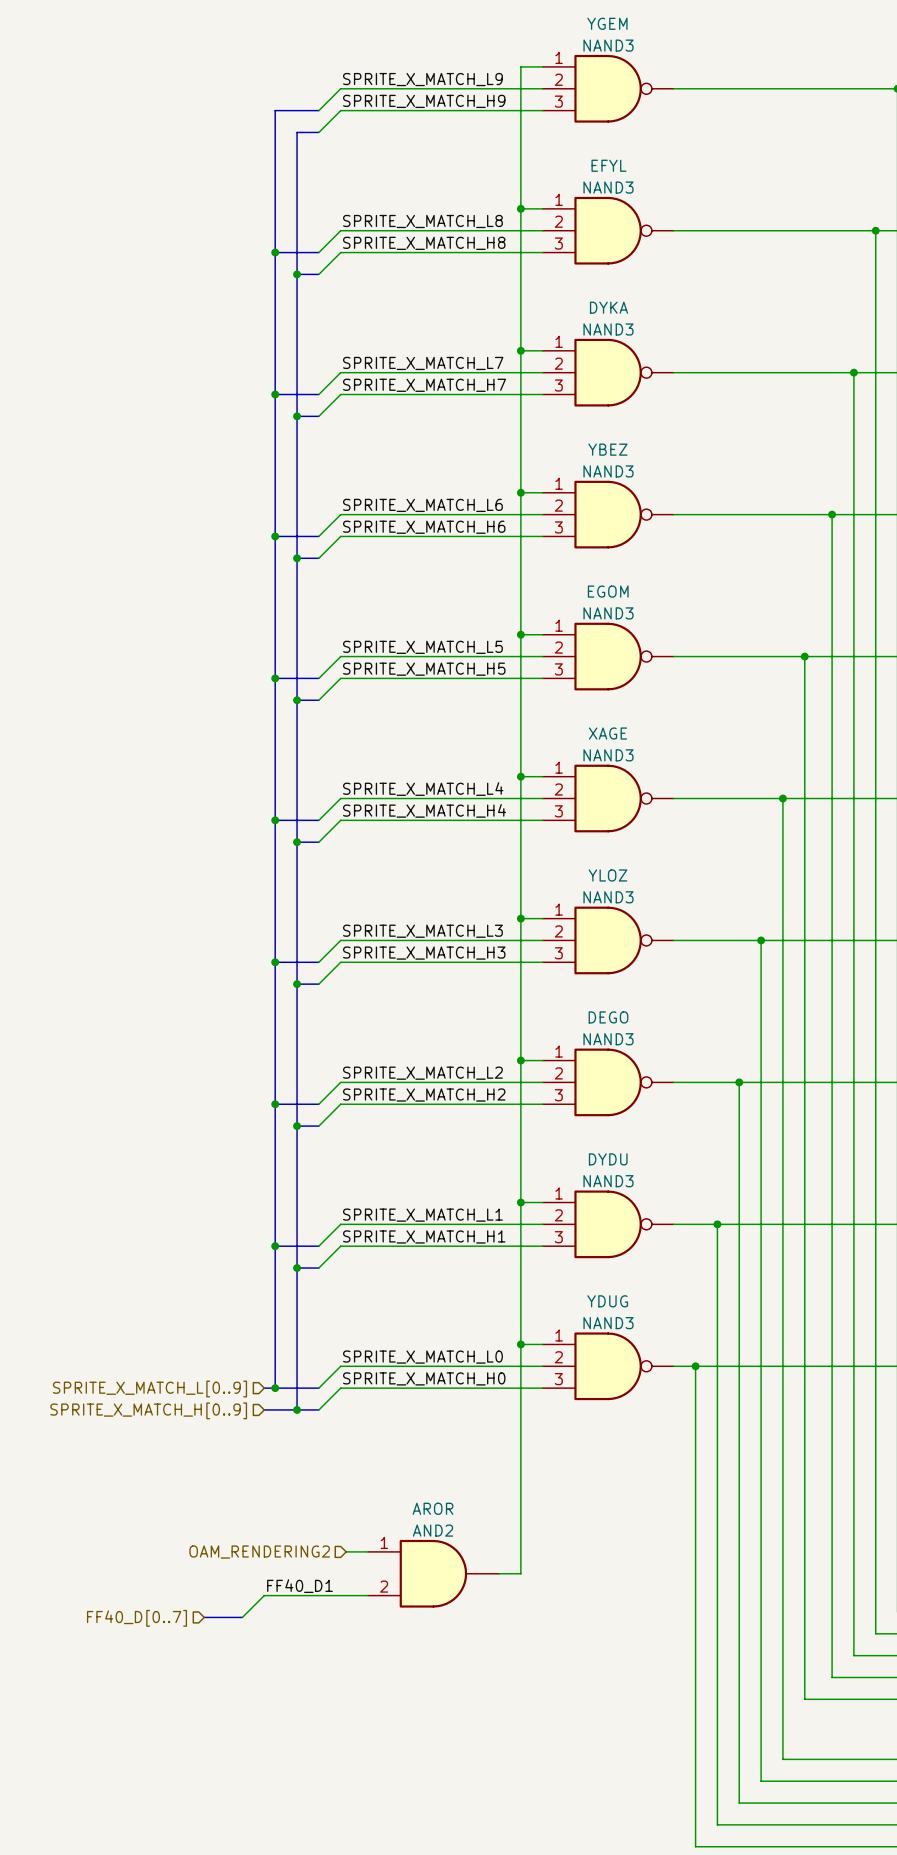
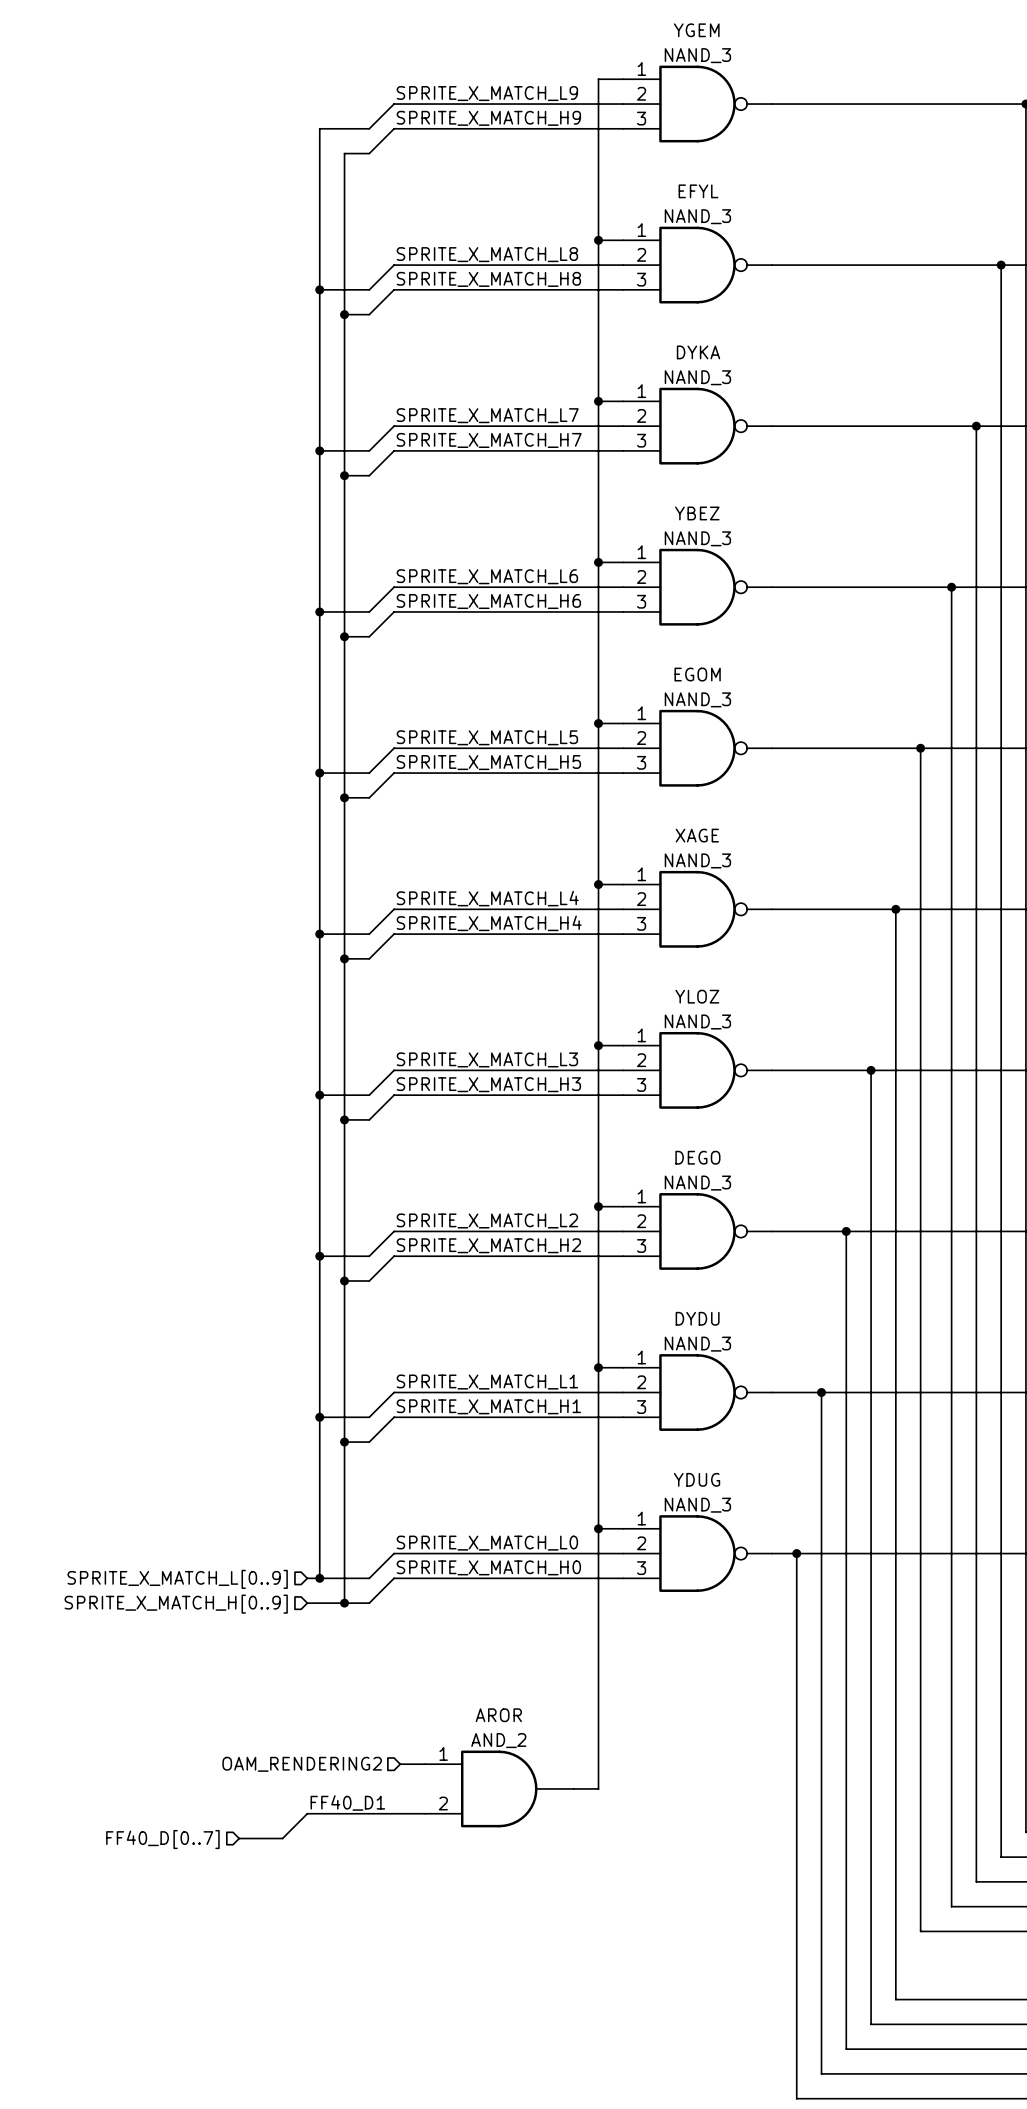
YGEM value: NAND3 (608, 45) -> NAND_3 (697, 55)
EFYL value: NAND3 (608, 187) -> NAND_3 (697, 216)
DYKA value: NAND3 (608, 329) -> NAND_3 (697, 377)
YBEZ value: NAND3 (608, 471) -> NAND_3 (697, 538)
EGOM value: NAND3 (608, 613) -> NAND_3 (697, 699)
XAGE value: NAND3 (608, 755) -> NAND_3 (697, 860)
YLOZ value: NAND3 (608, 897) -> NAND_3 (697, 1022)
DEGO value: NAND3 (608, 1039) -> NAND_3 (697, 1183)
DYDU value: NAND3 (608, 1181) -> NAND_3 (697, 1344)
YDUG value: NAND3 (608, 1323) -> NAND_3 (697, 1505)
AROR value: AND2 (433, 1530) -> AND_2 (498, 1740)

